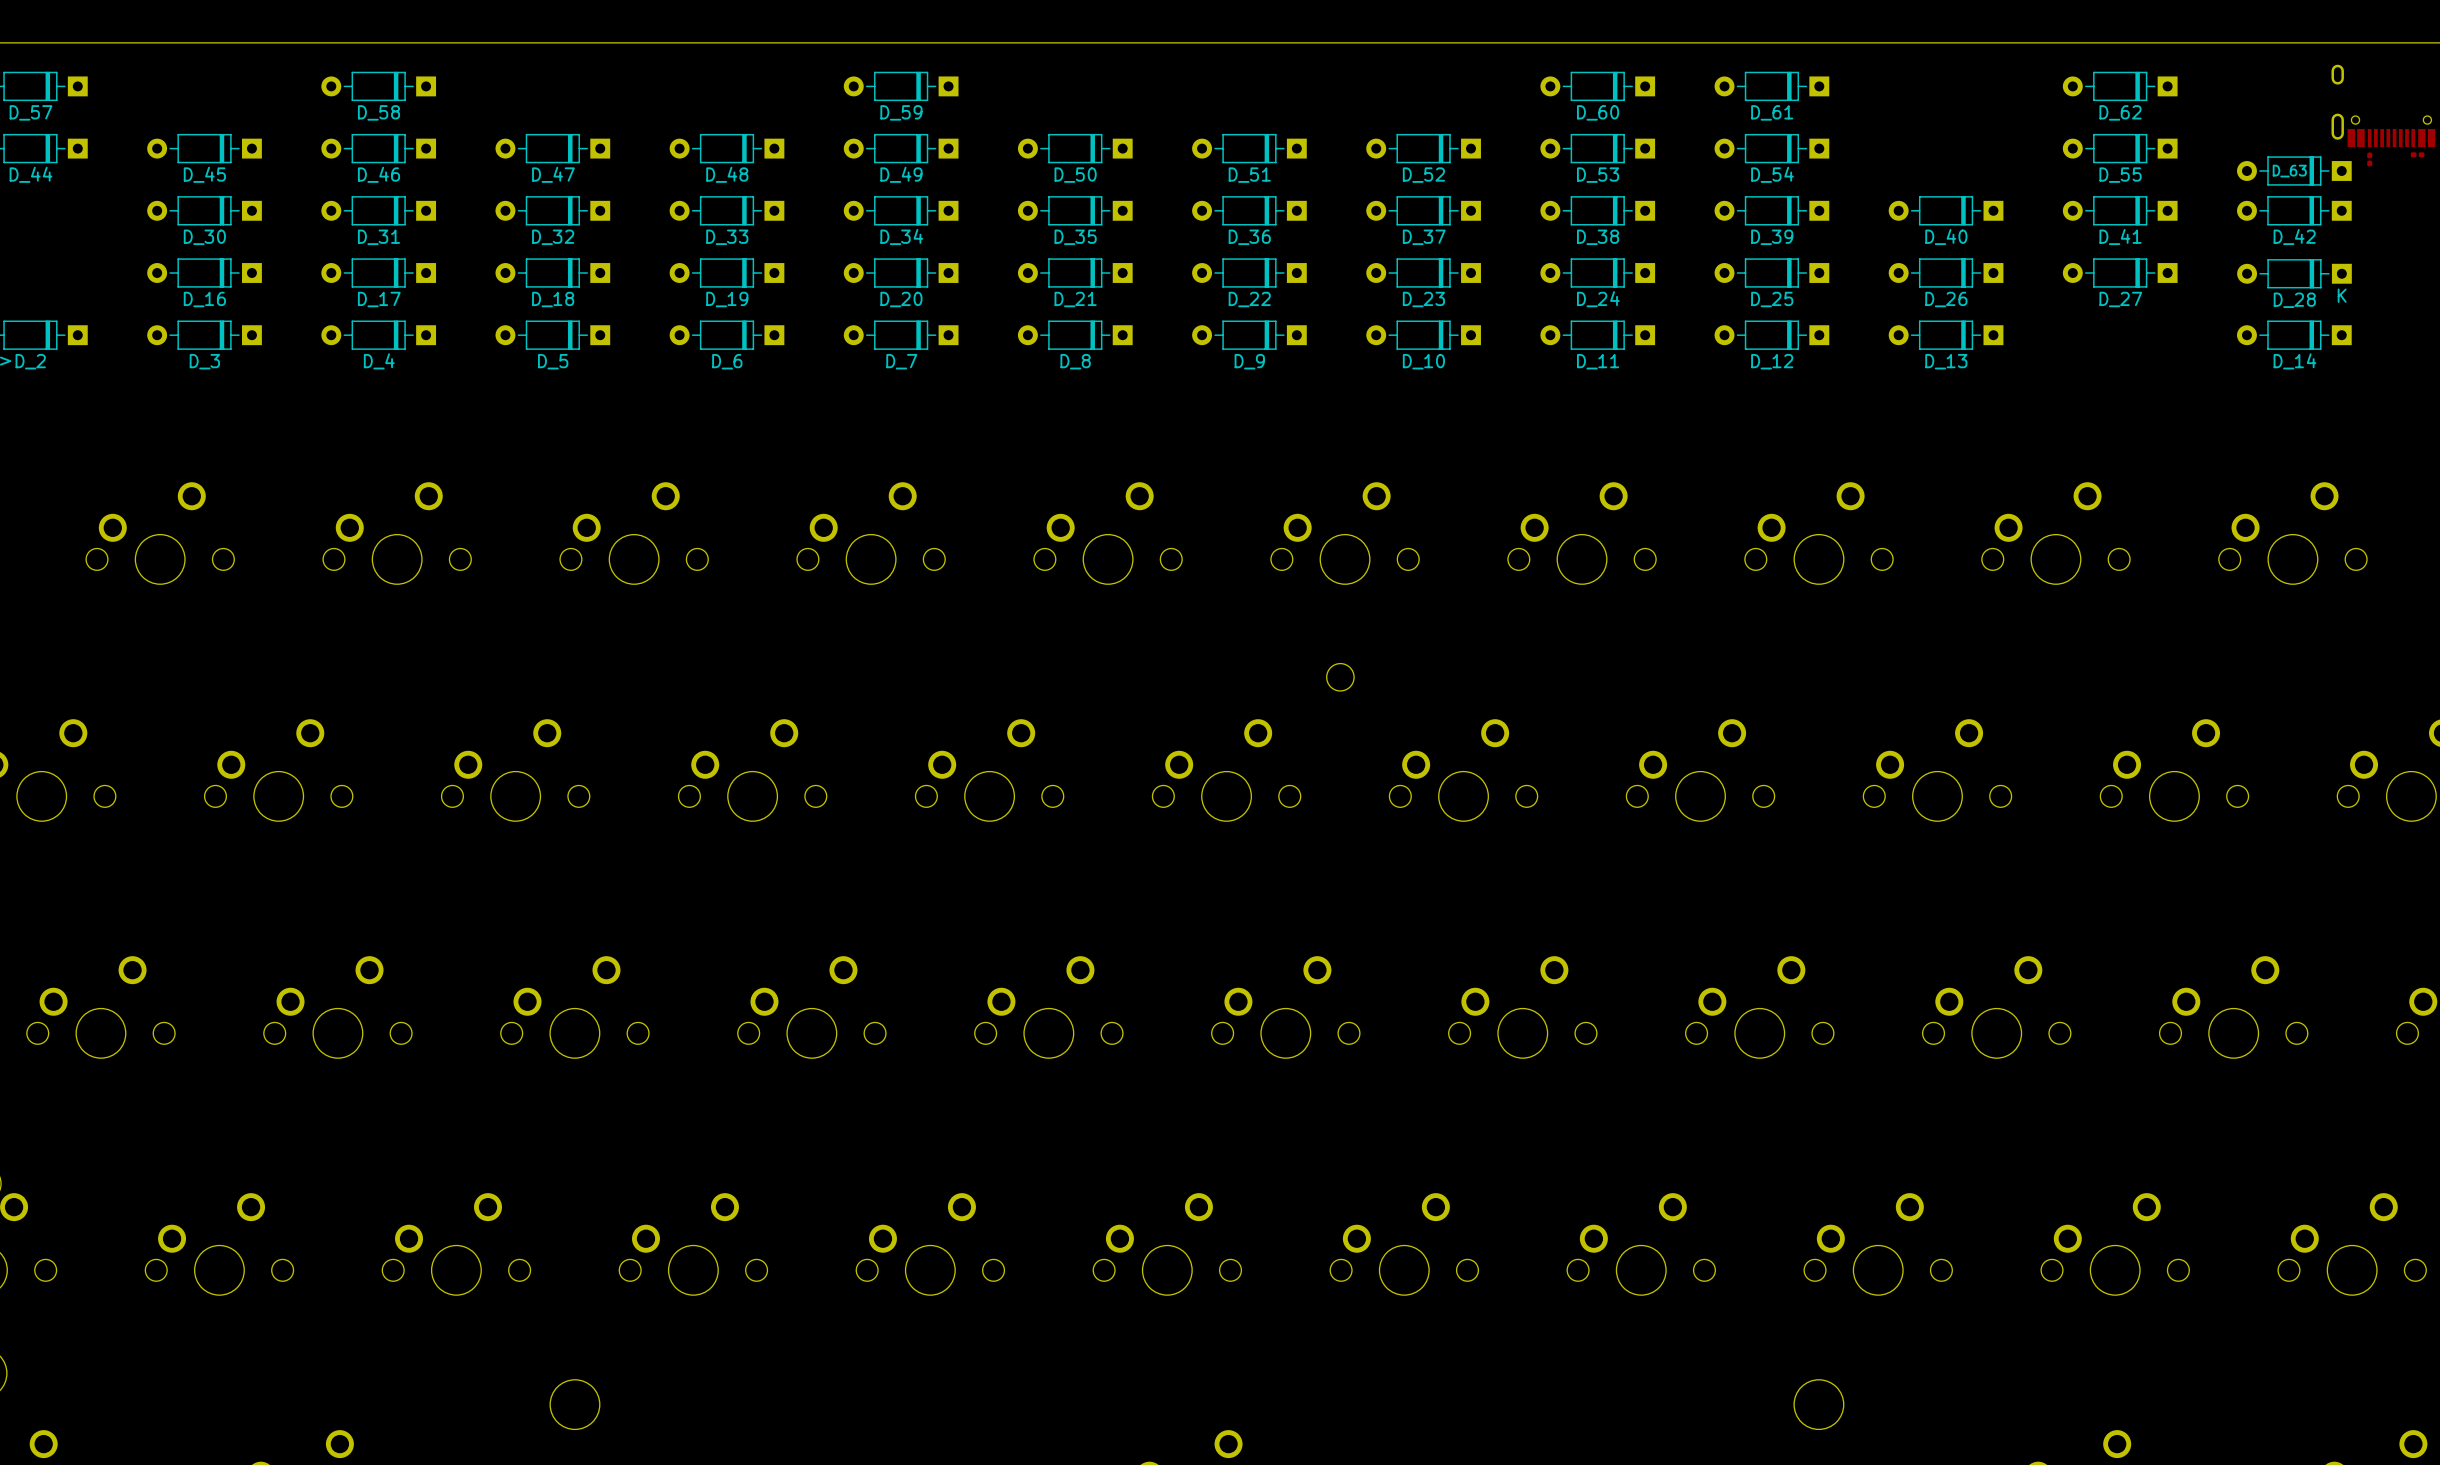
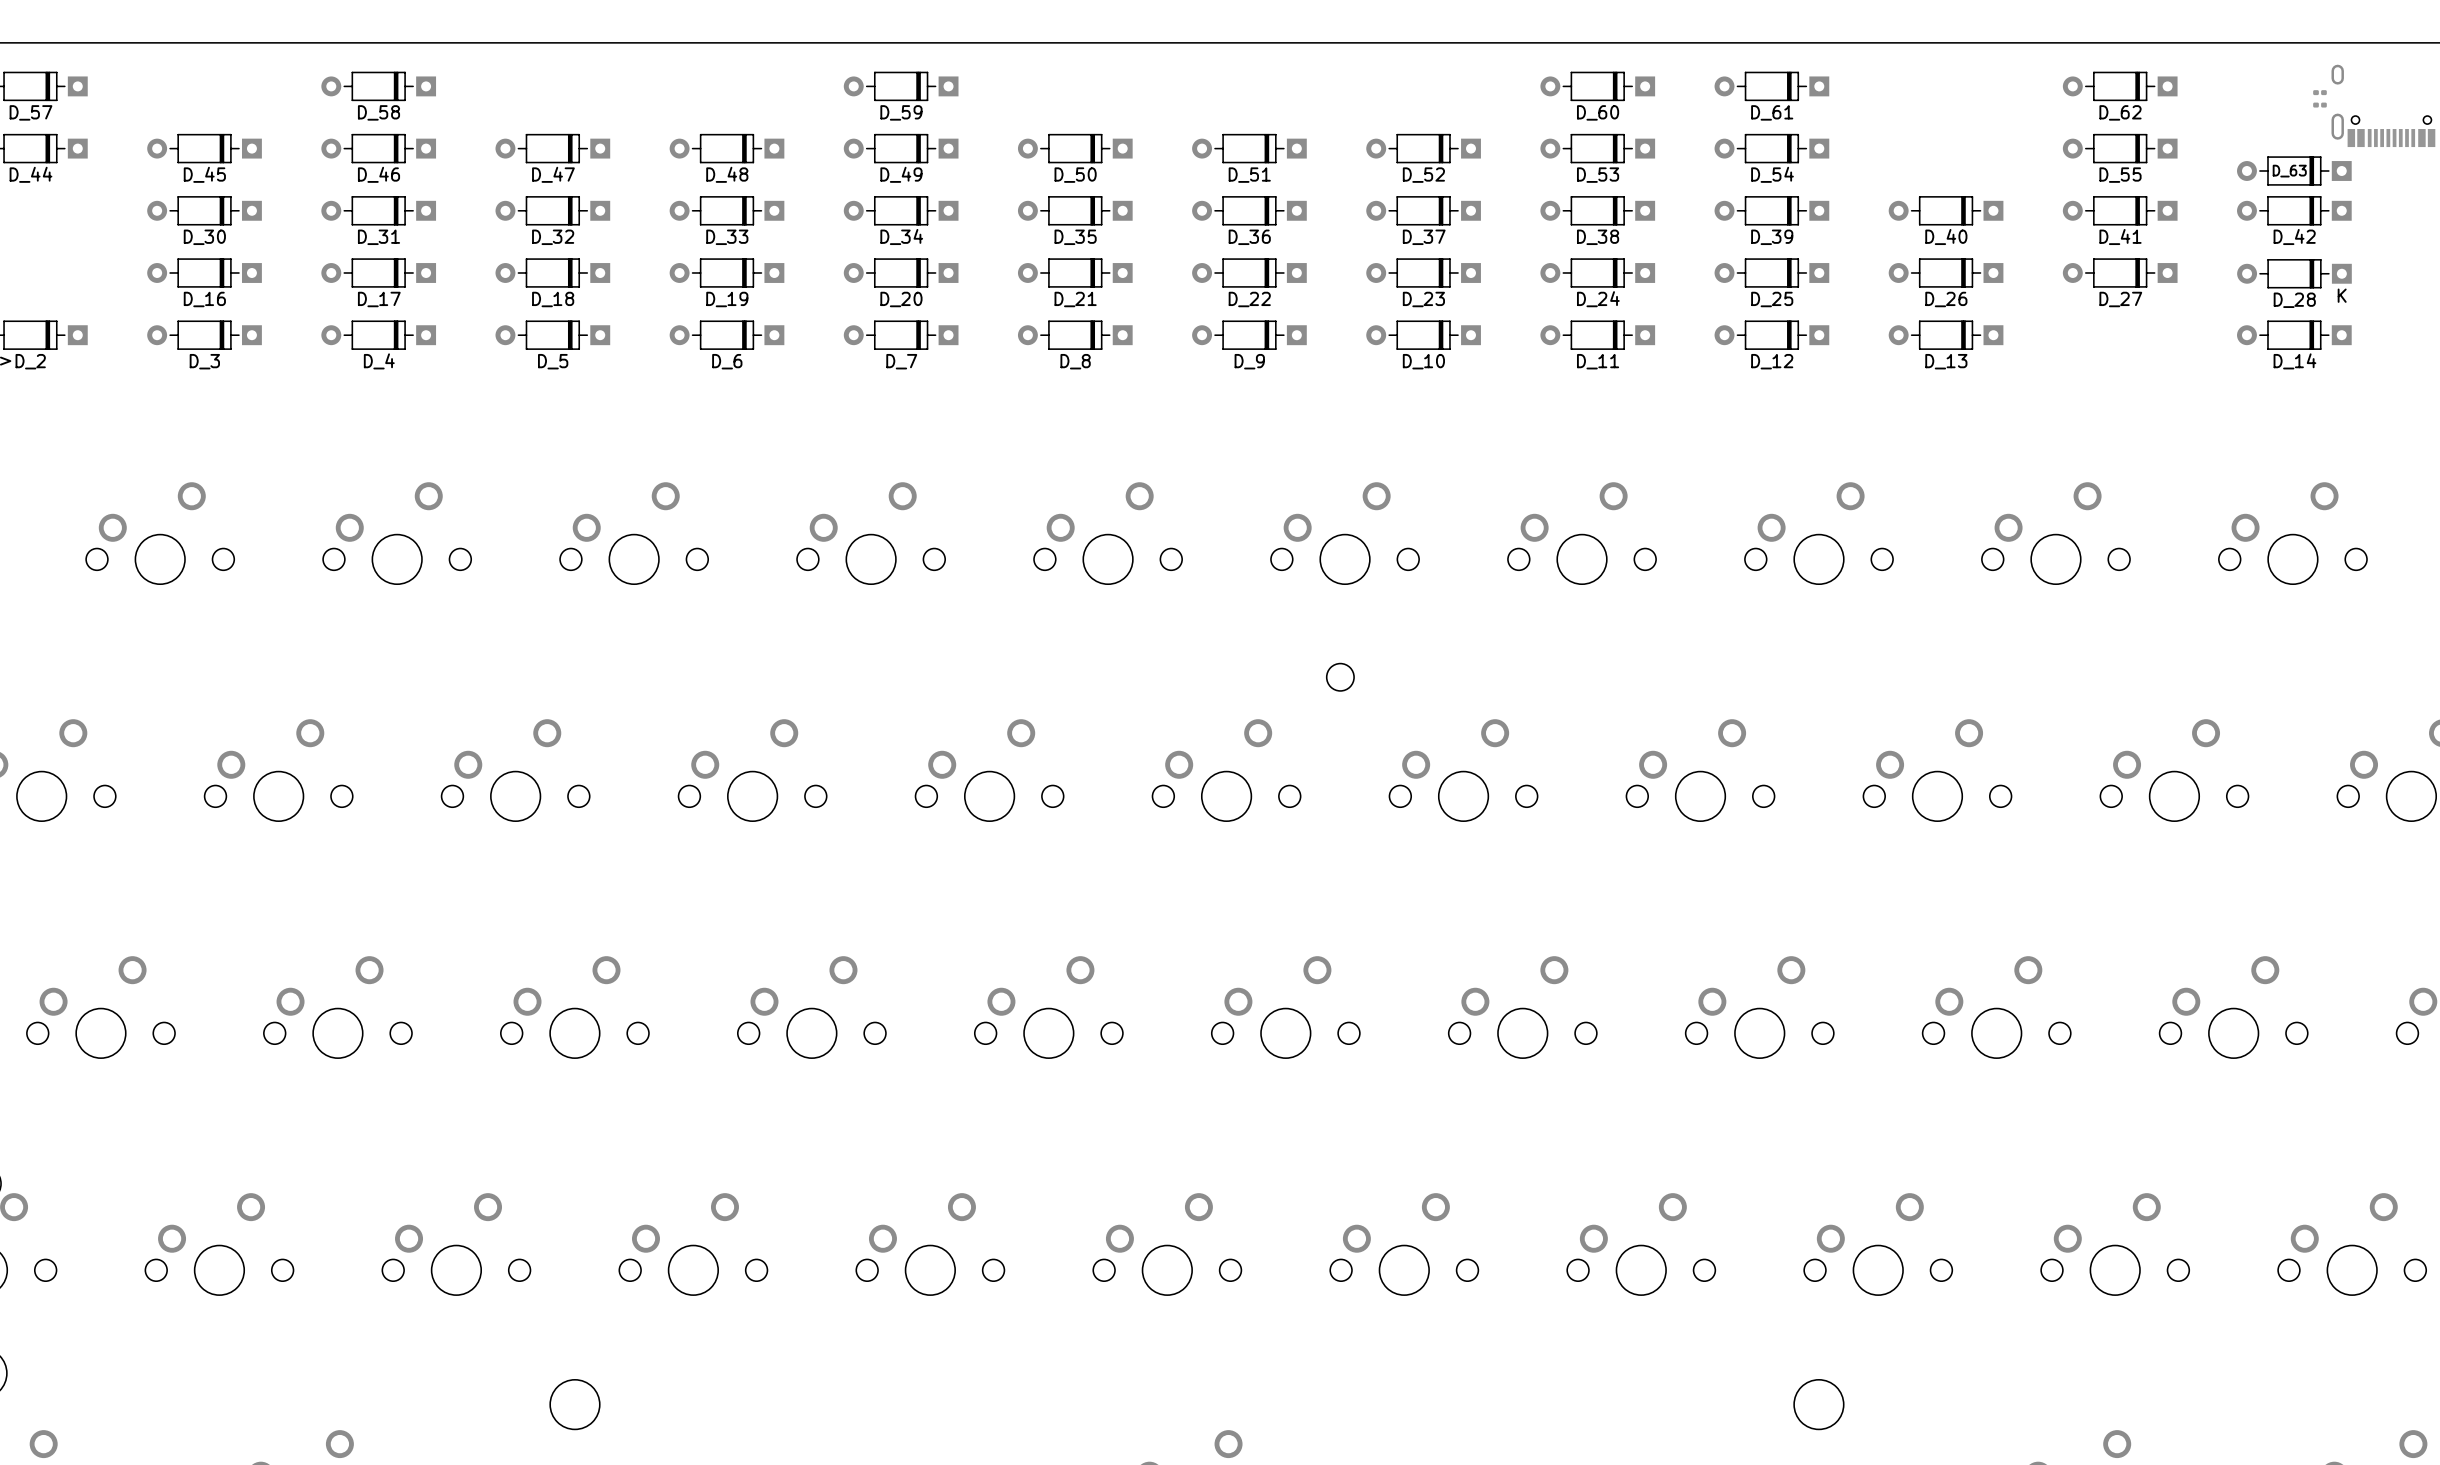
part: none -> (2319, 92)
part: none -> (2319, 105)
part: (2417, 154) -> none
part: (2369, 159) -> none

